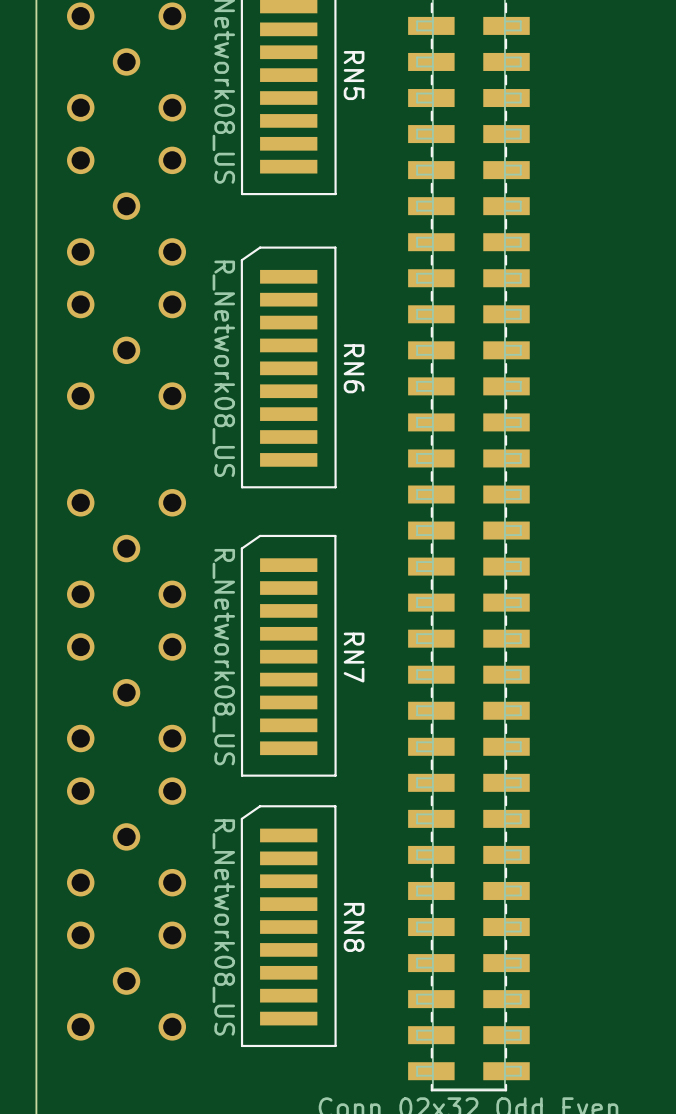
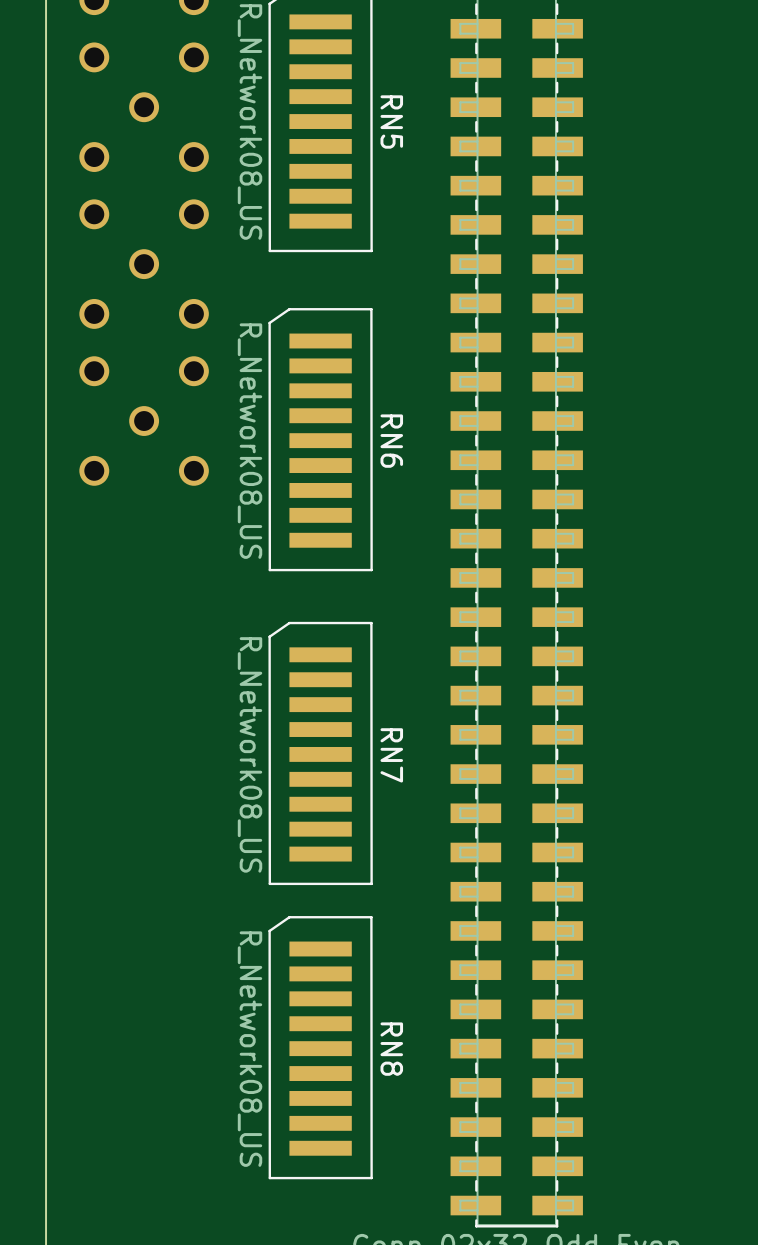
part: (126, 548) -> none
part: (126, 692) -> none
part: (126, 836) -> none
part: (126, 981) -> none

